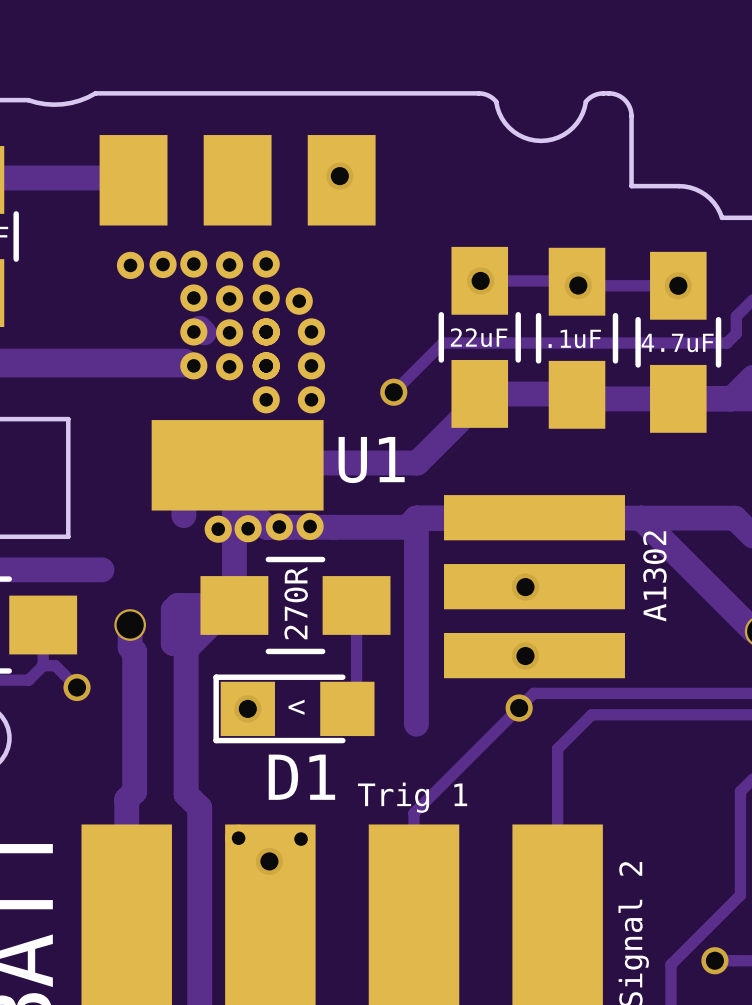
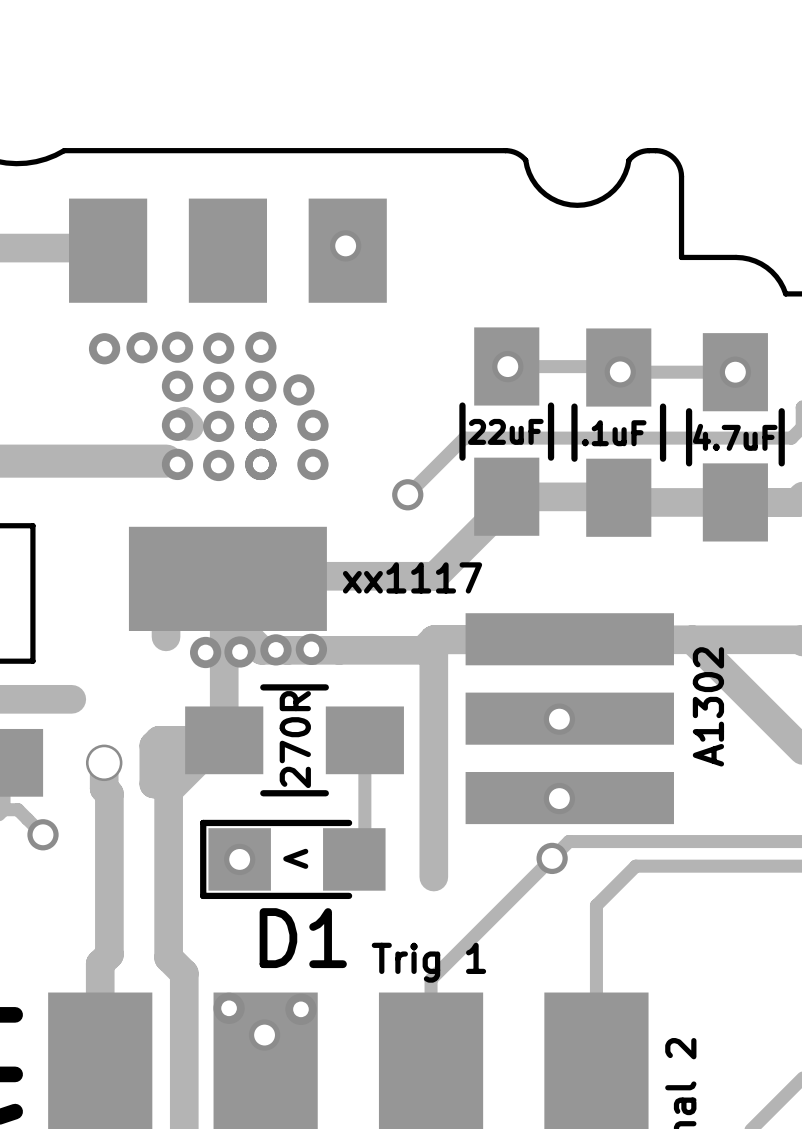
part: (266, 399) -> none
part: (311, 399) -> none
U1 name: U1 (371, 460) -> xx1117 (412, 577)

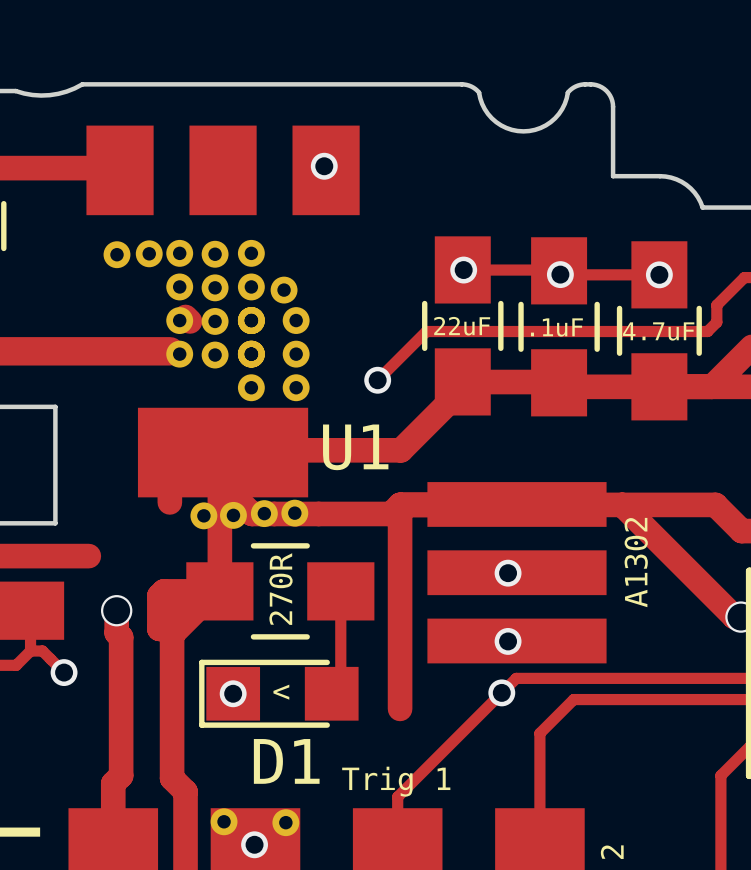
part: none -> (251, 387)
part: none -> (296, 387)
xx1117 name: xx1117 (412, 577) -> U1 (355, 447)

